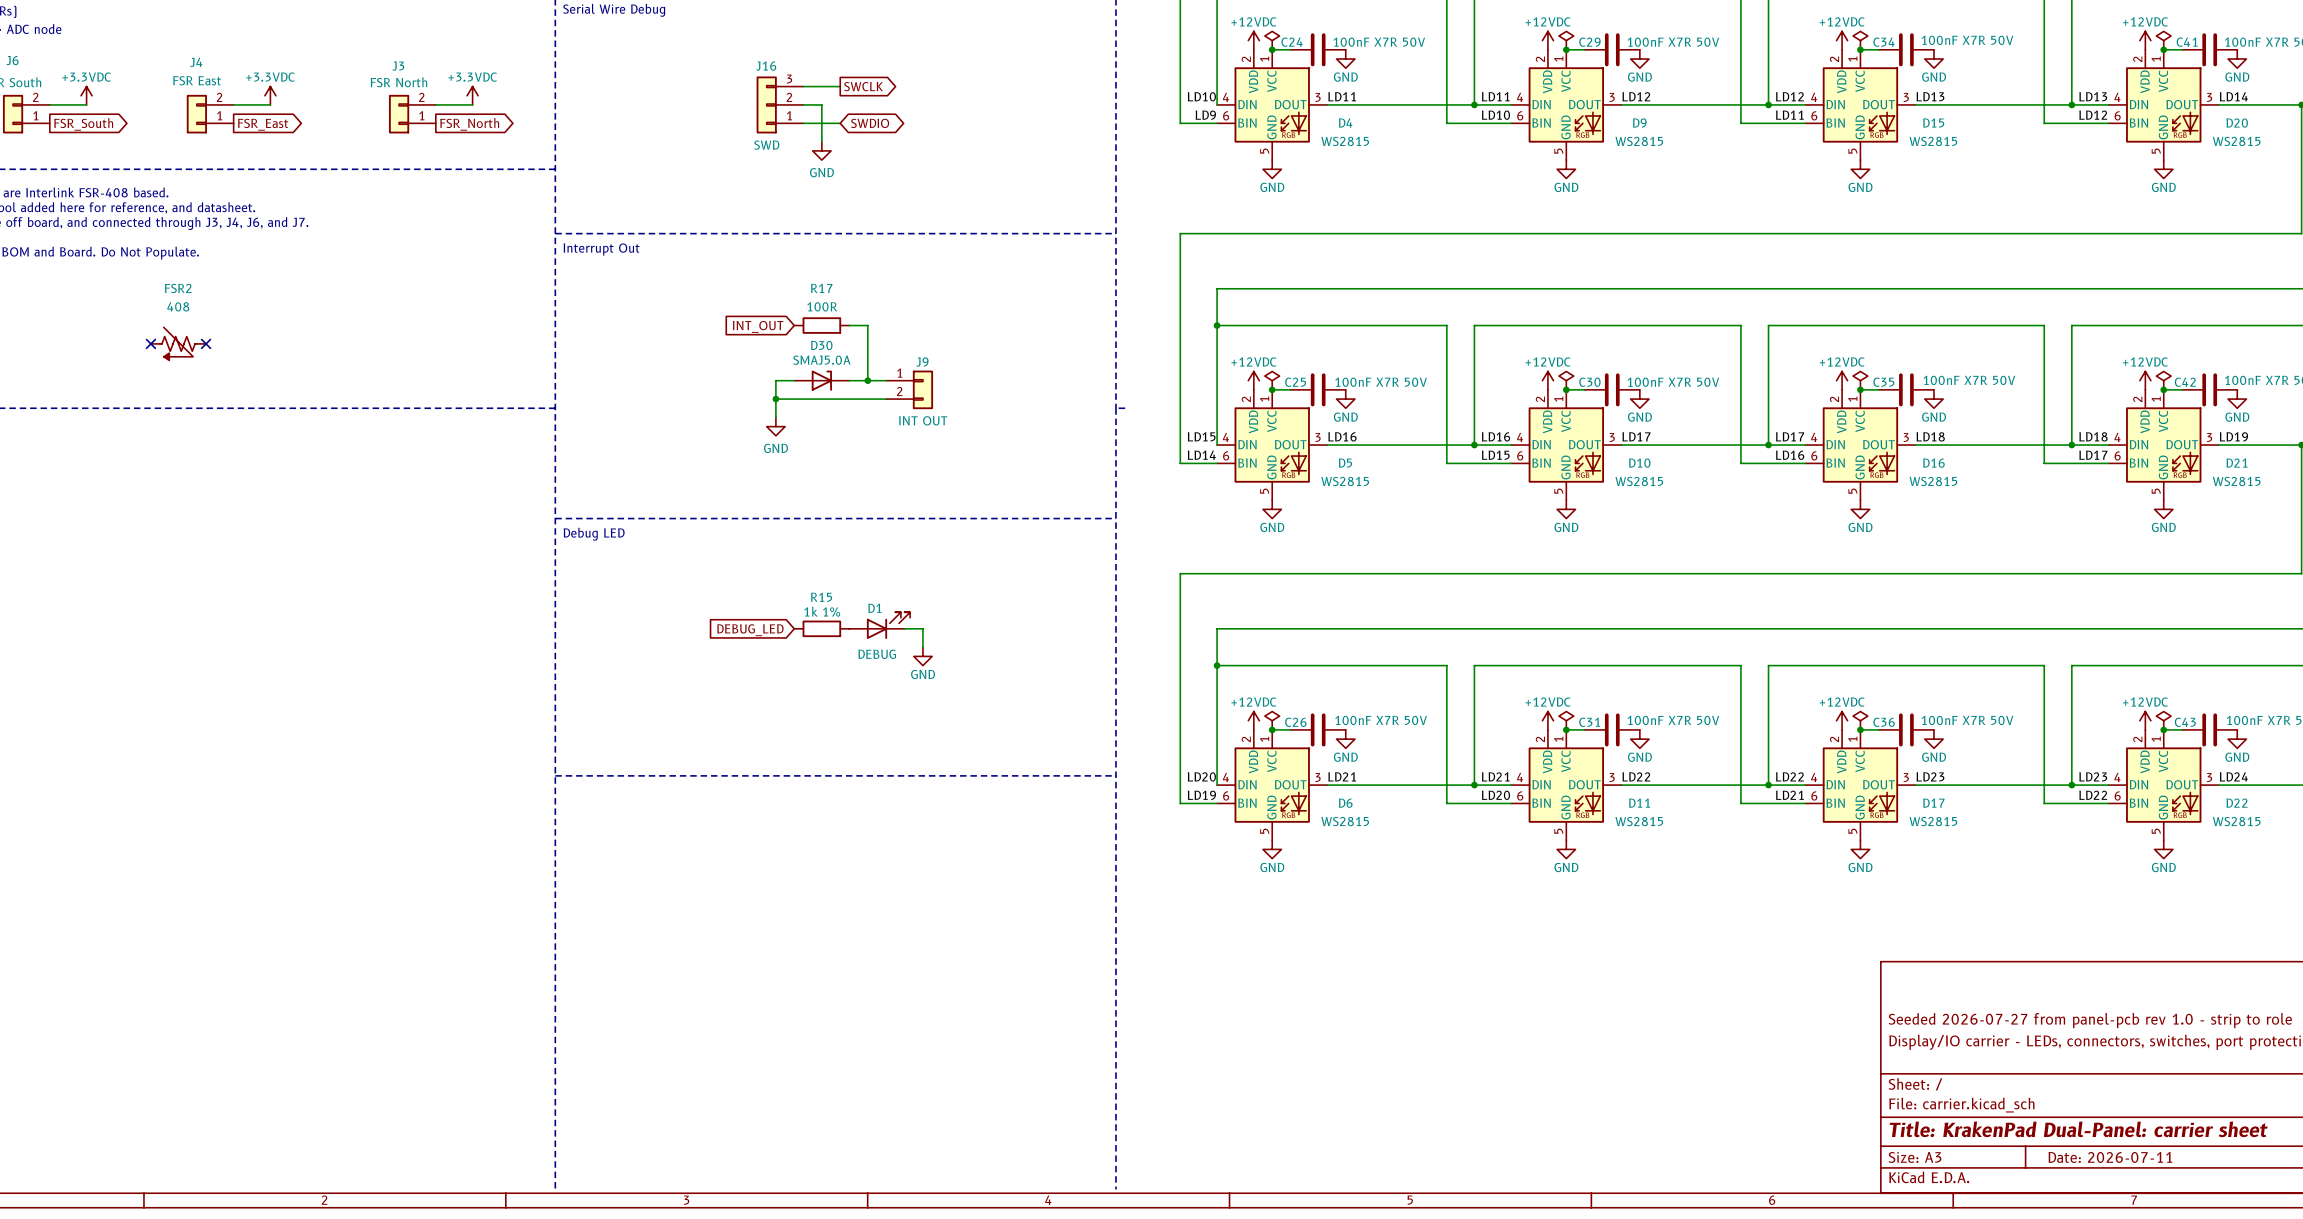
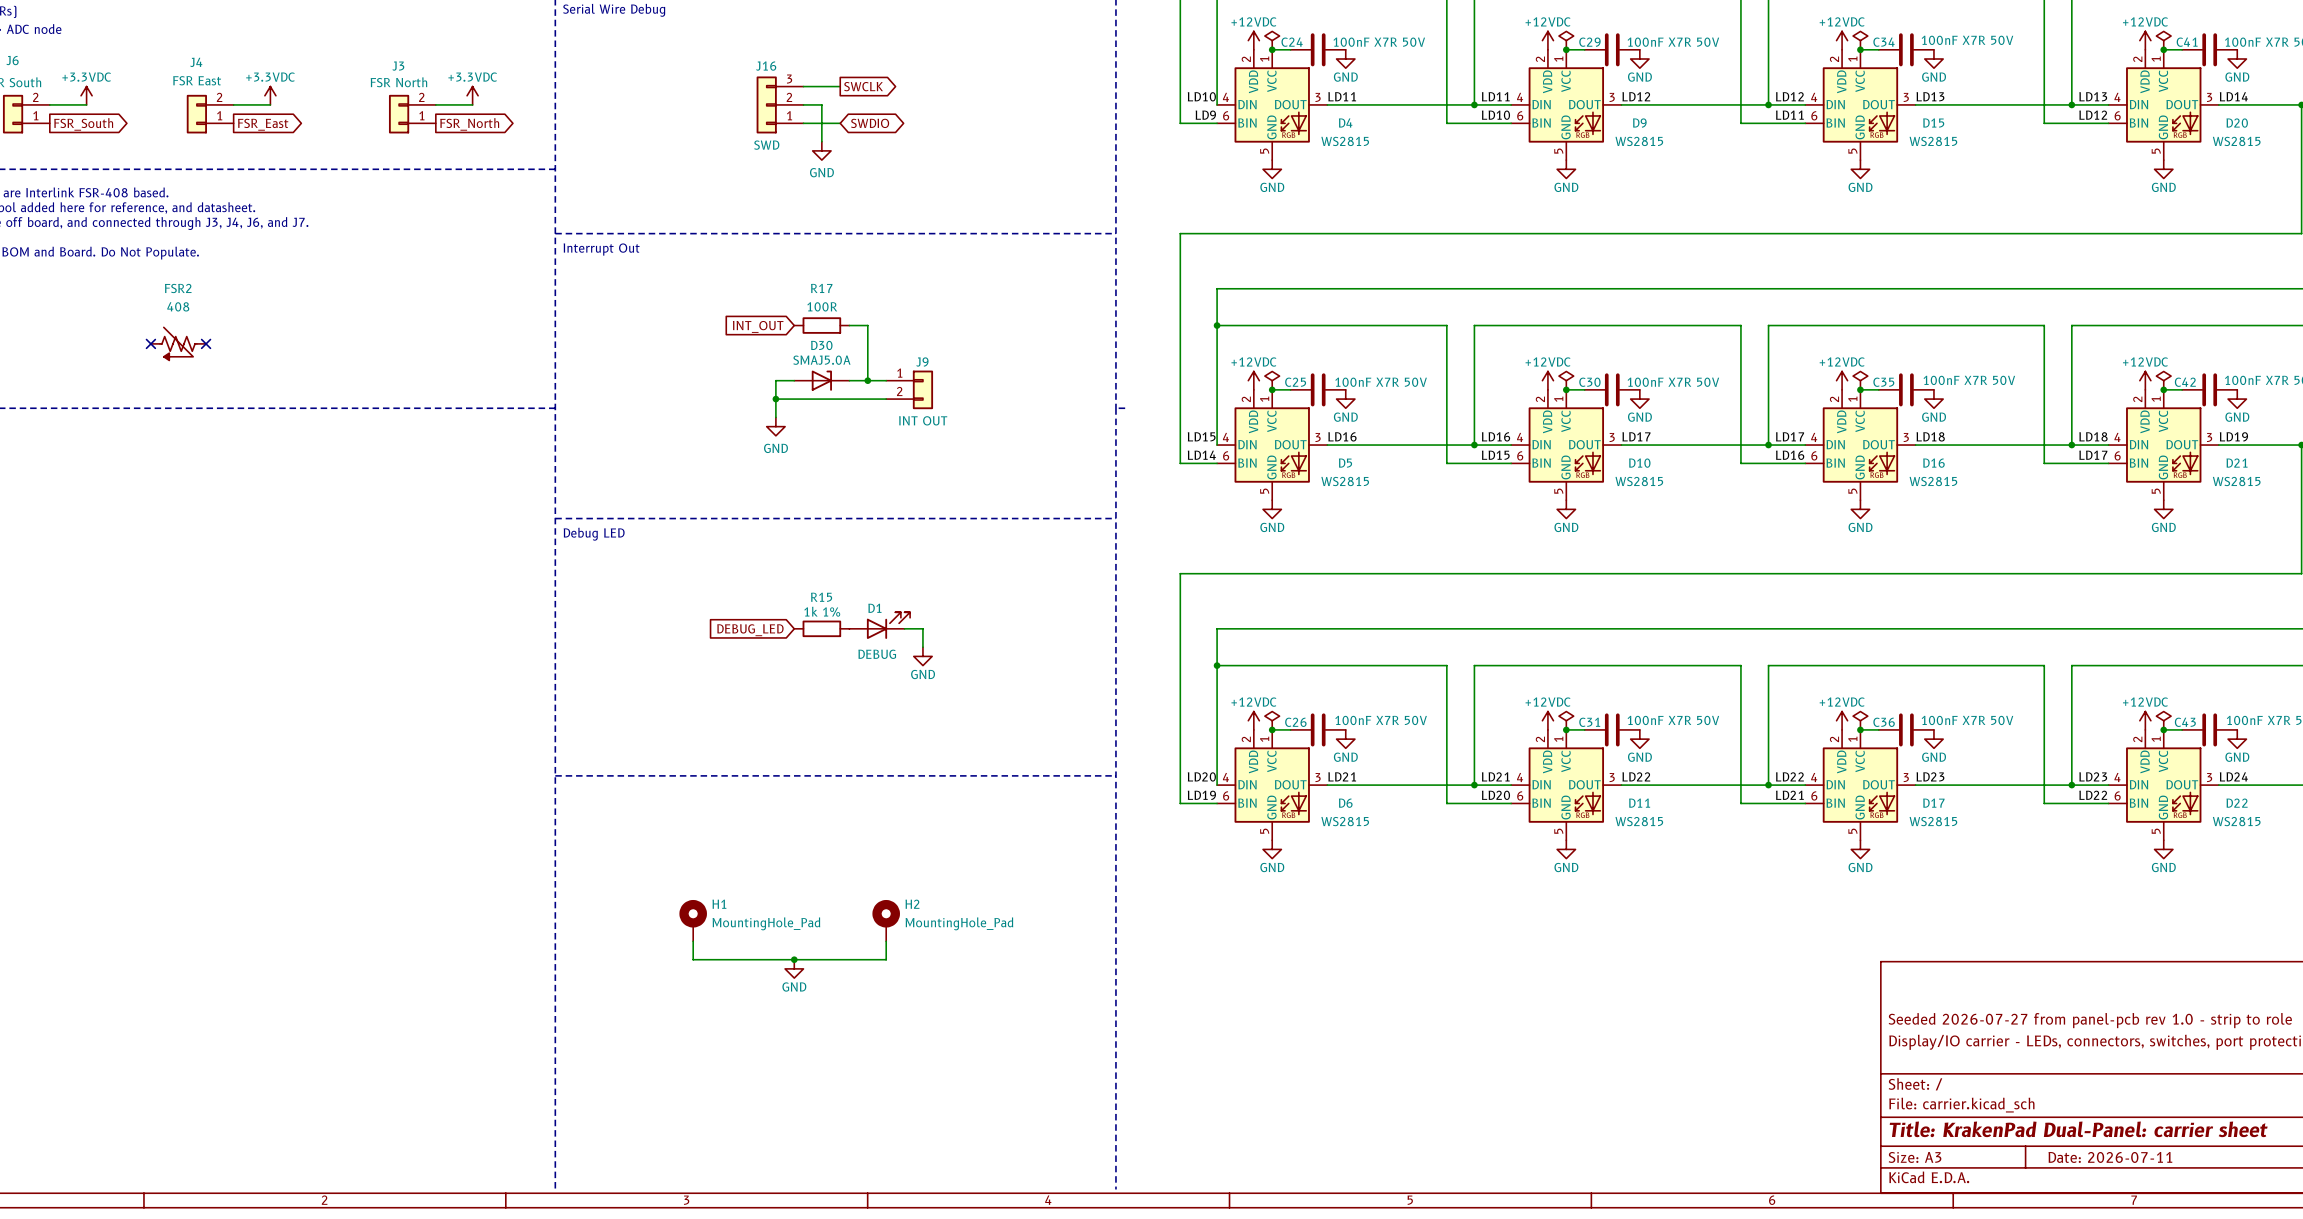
H1: none -> MountingHole_Pad (693, 920)
H2: none -> MountingHole_Pad (886, 920)
wire: none -> (693, 941) (693, 959) (886, 959) (886, 941)
junction: none -> (794, 959)
power symbol: none -> GND (794, 968)

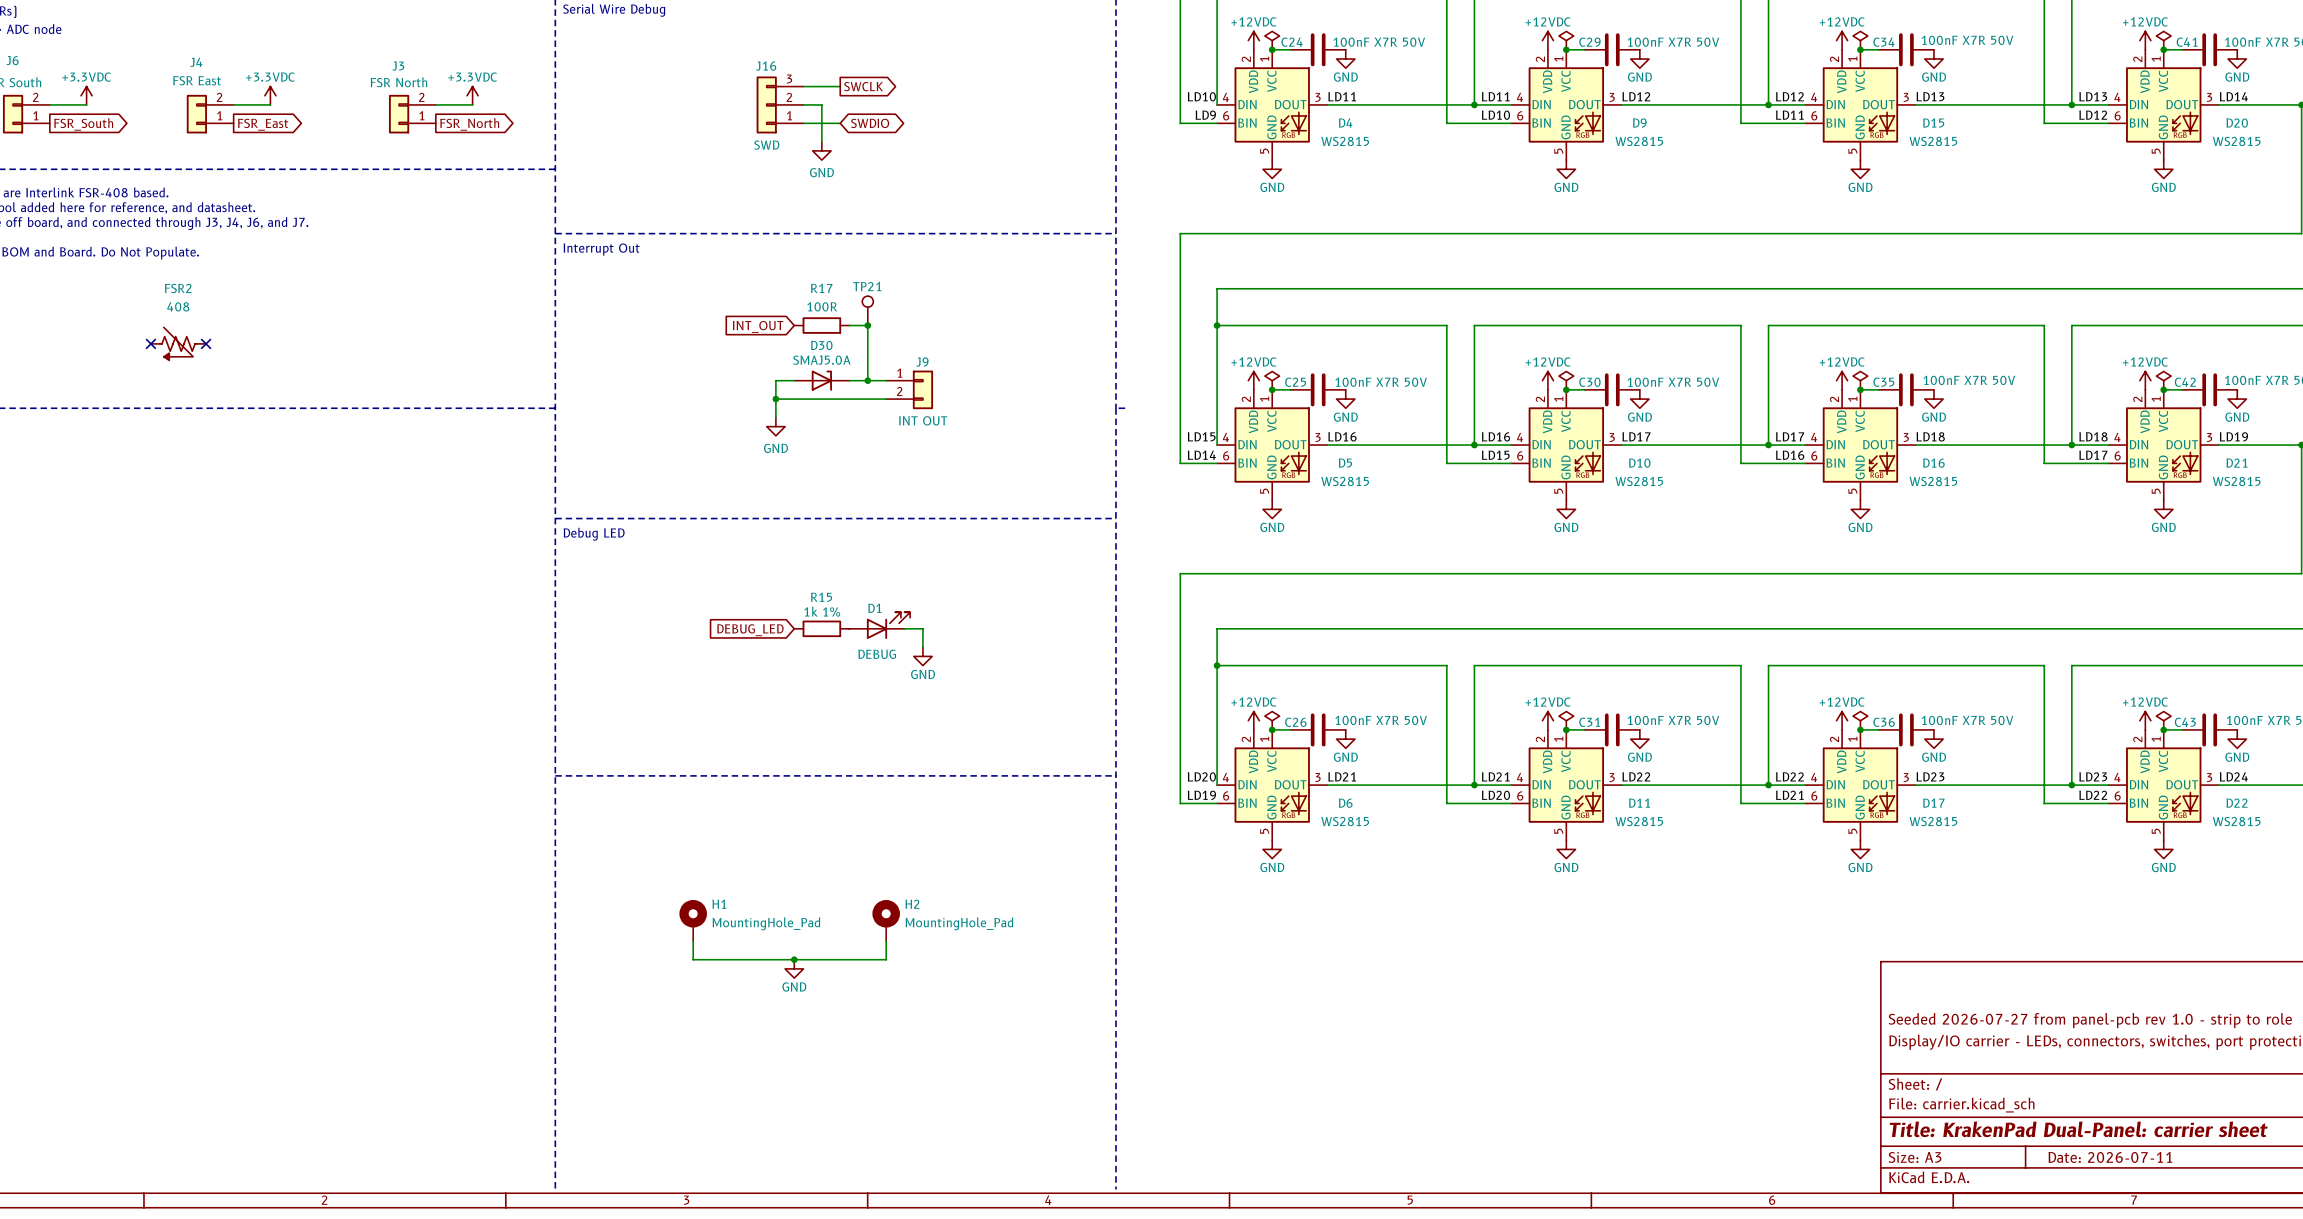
TP21: none -> (867, 310)
junction: none -> (867, 325)

